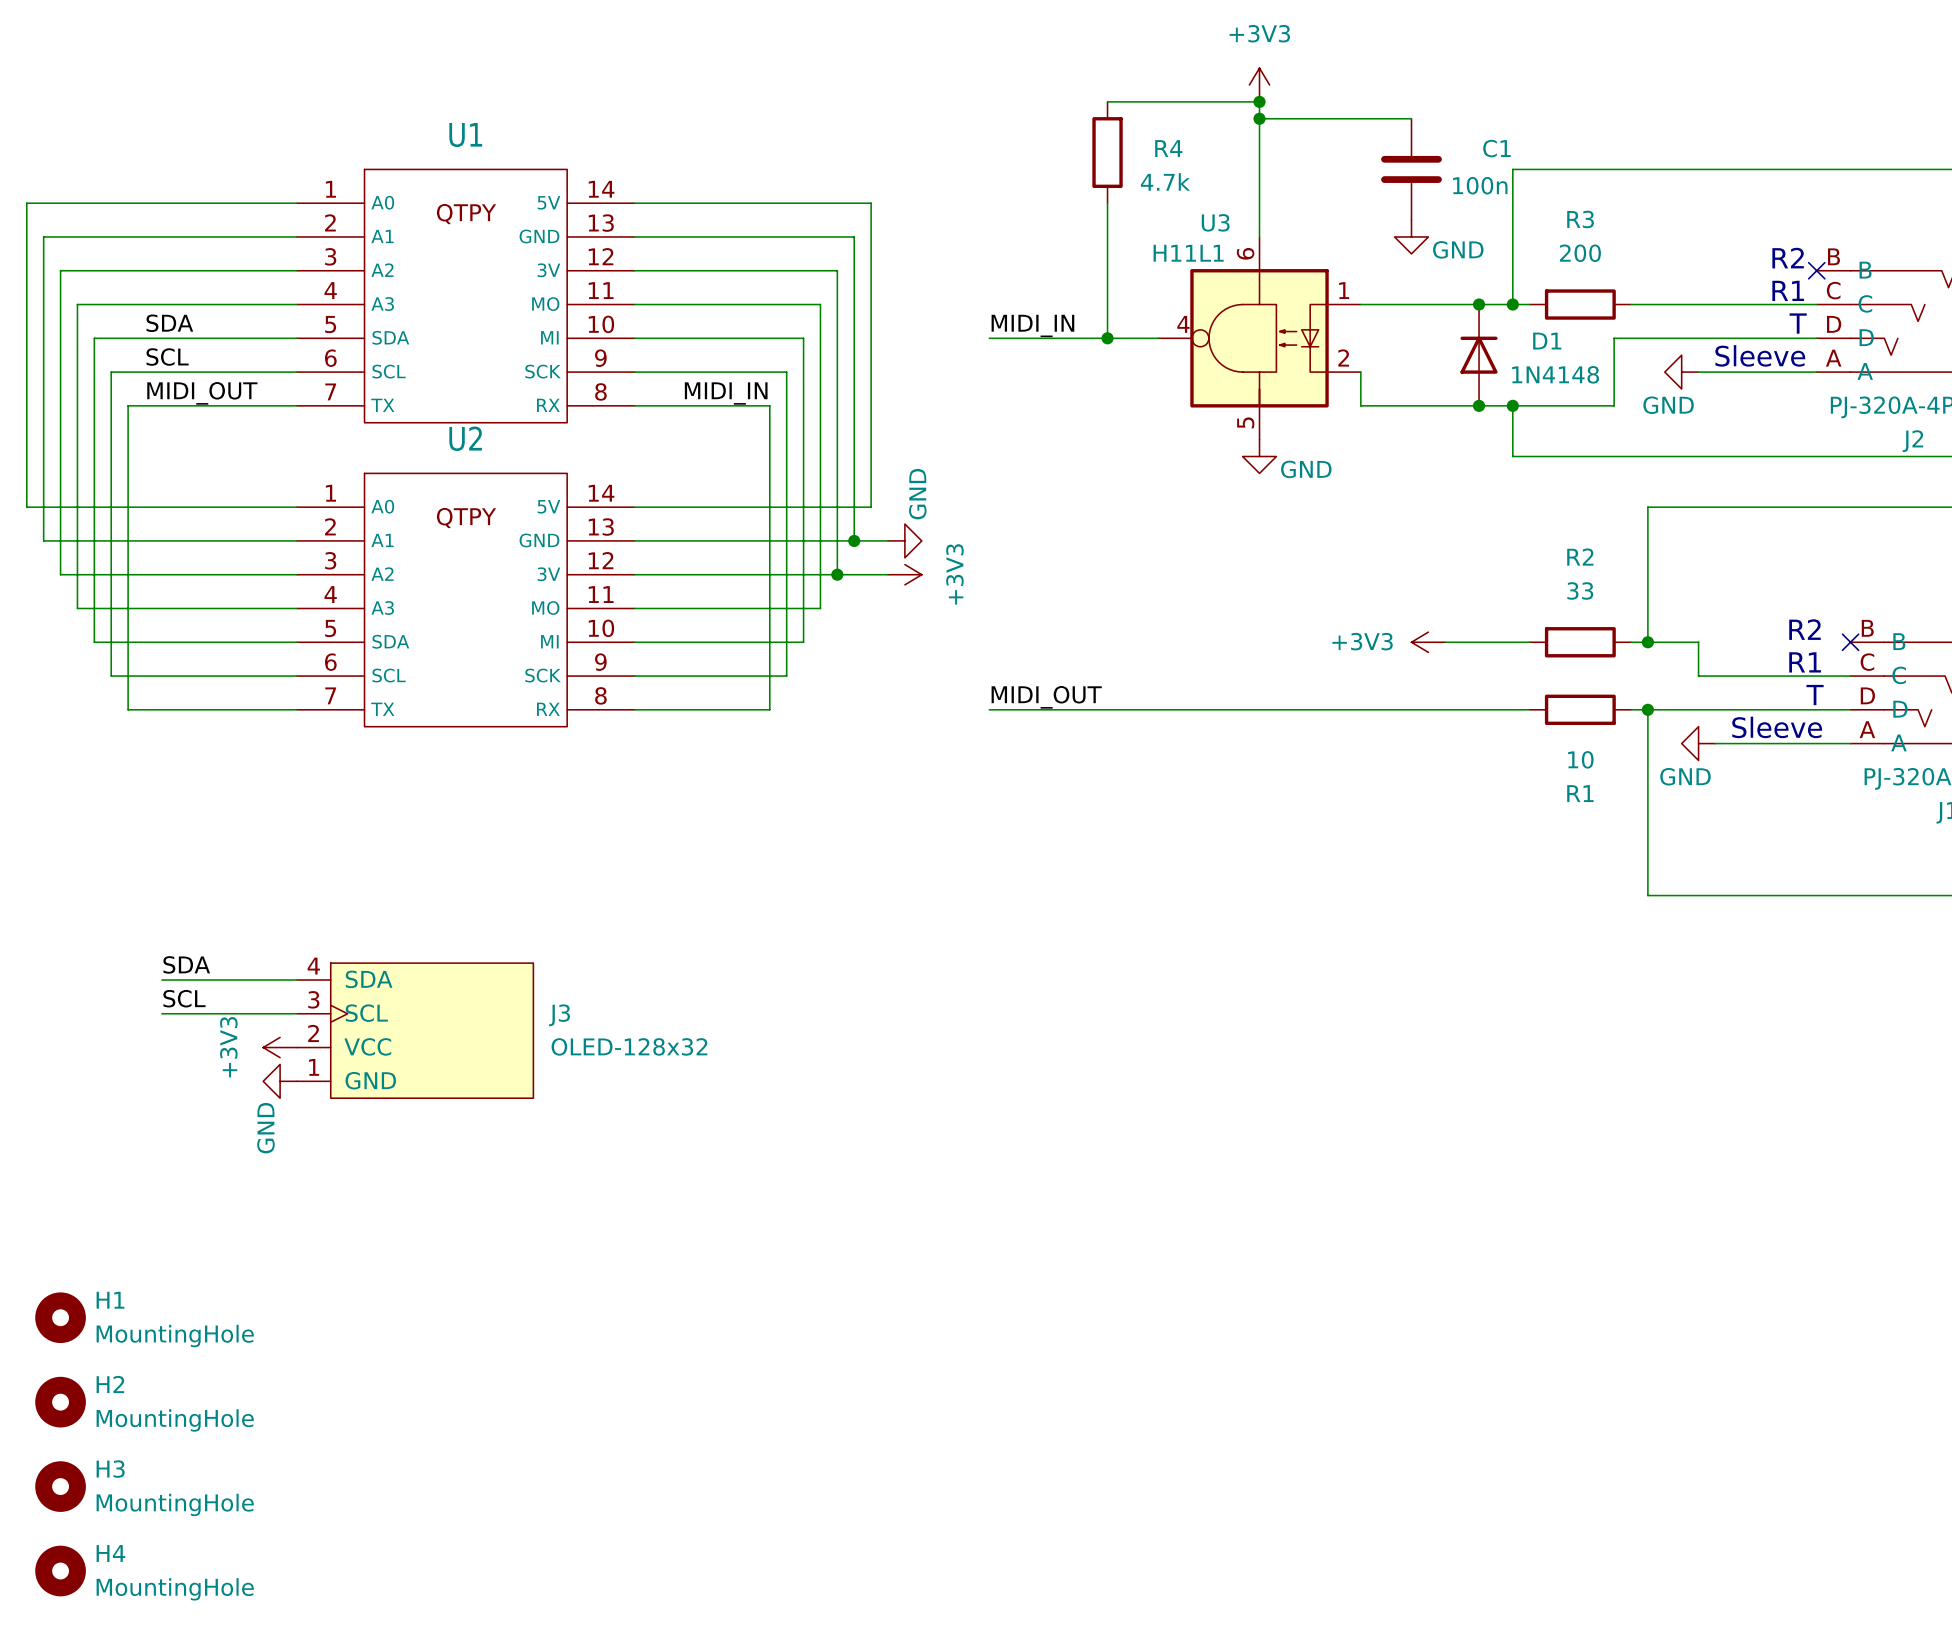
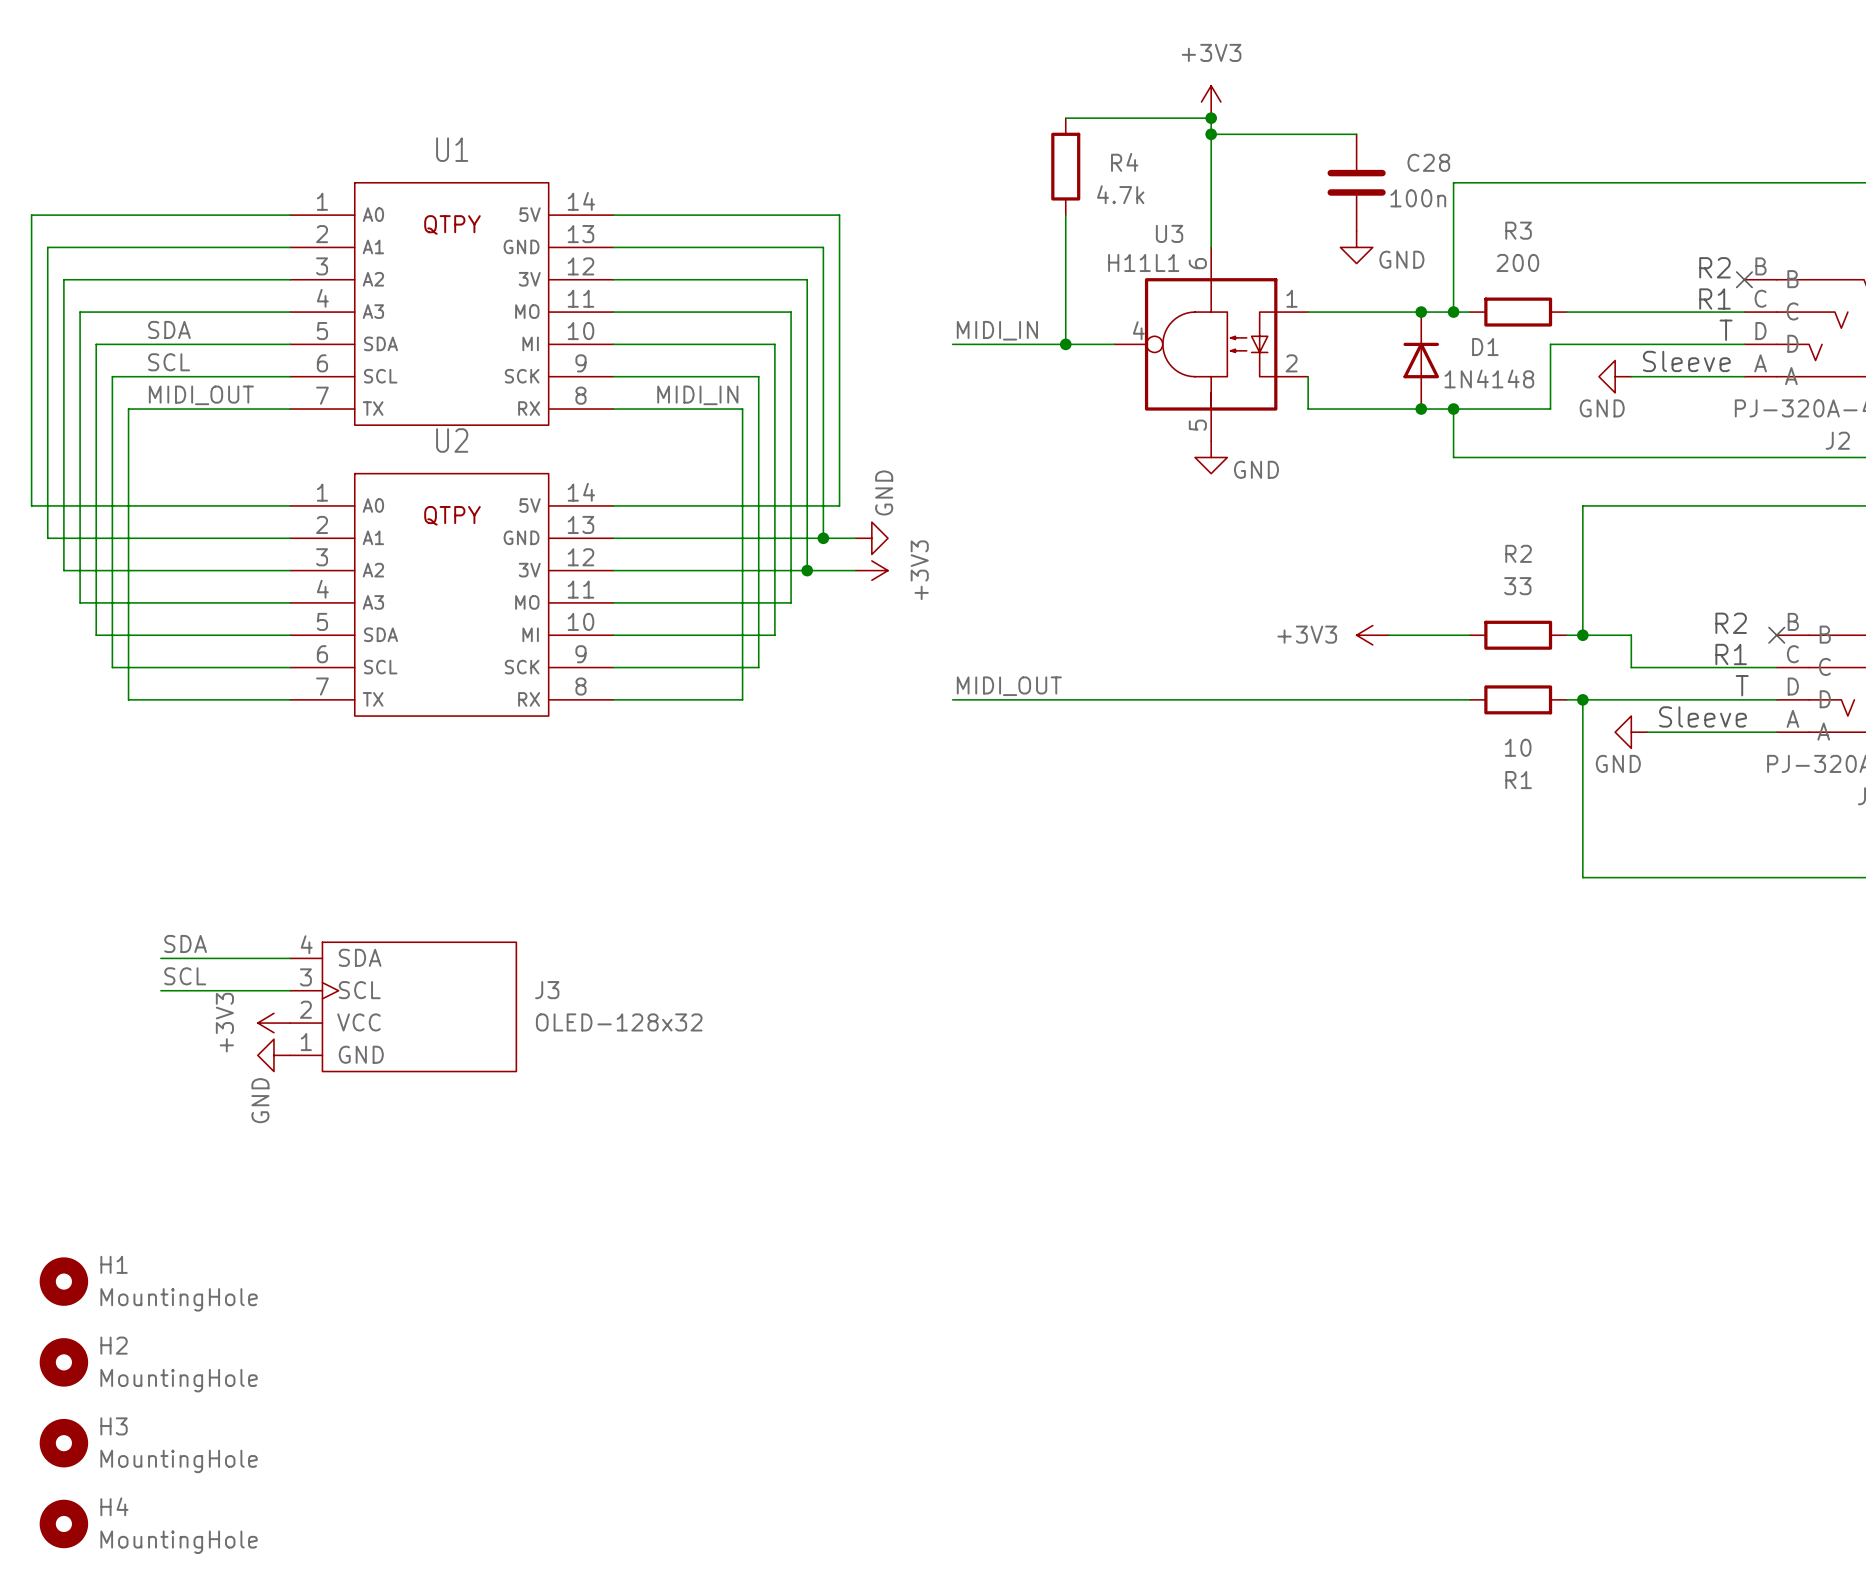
C1 name: C1 (1496, 148) -> C28 (1428, 162)

